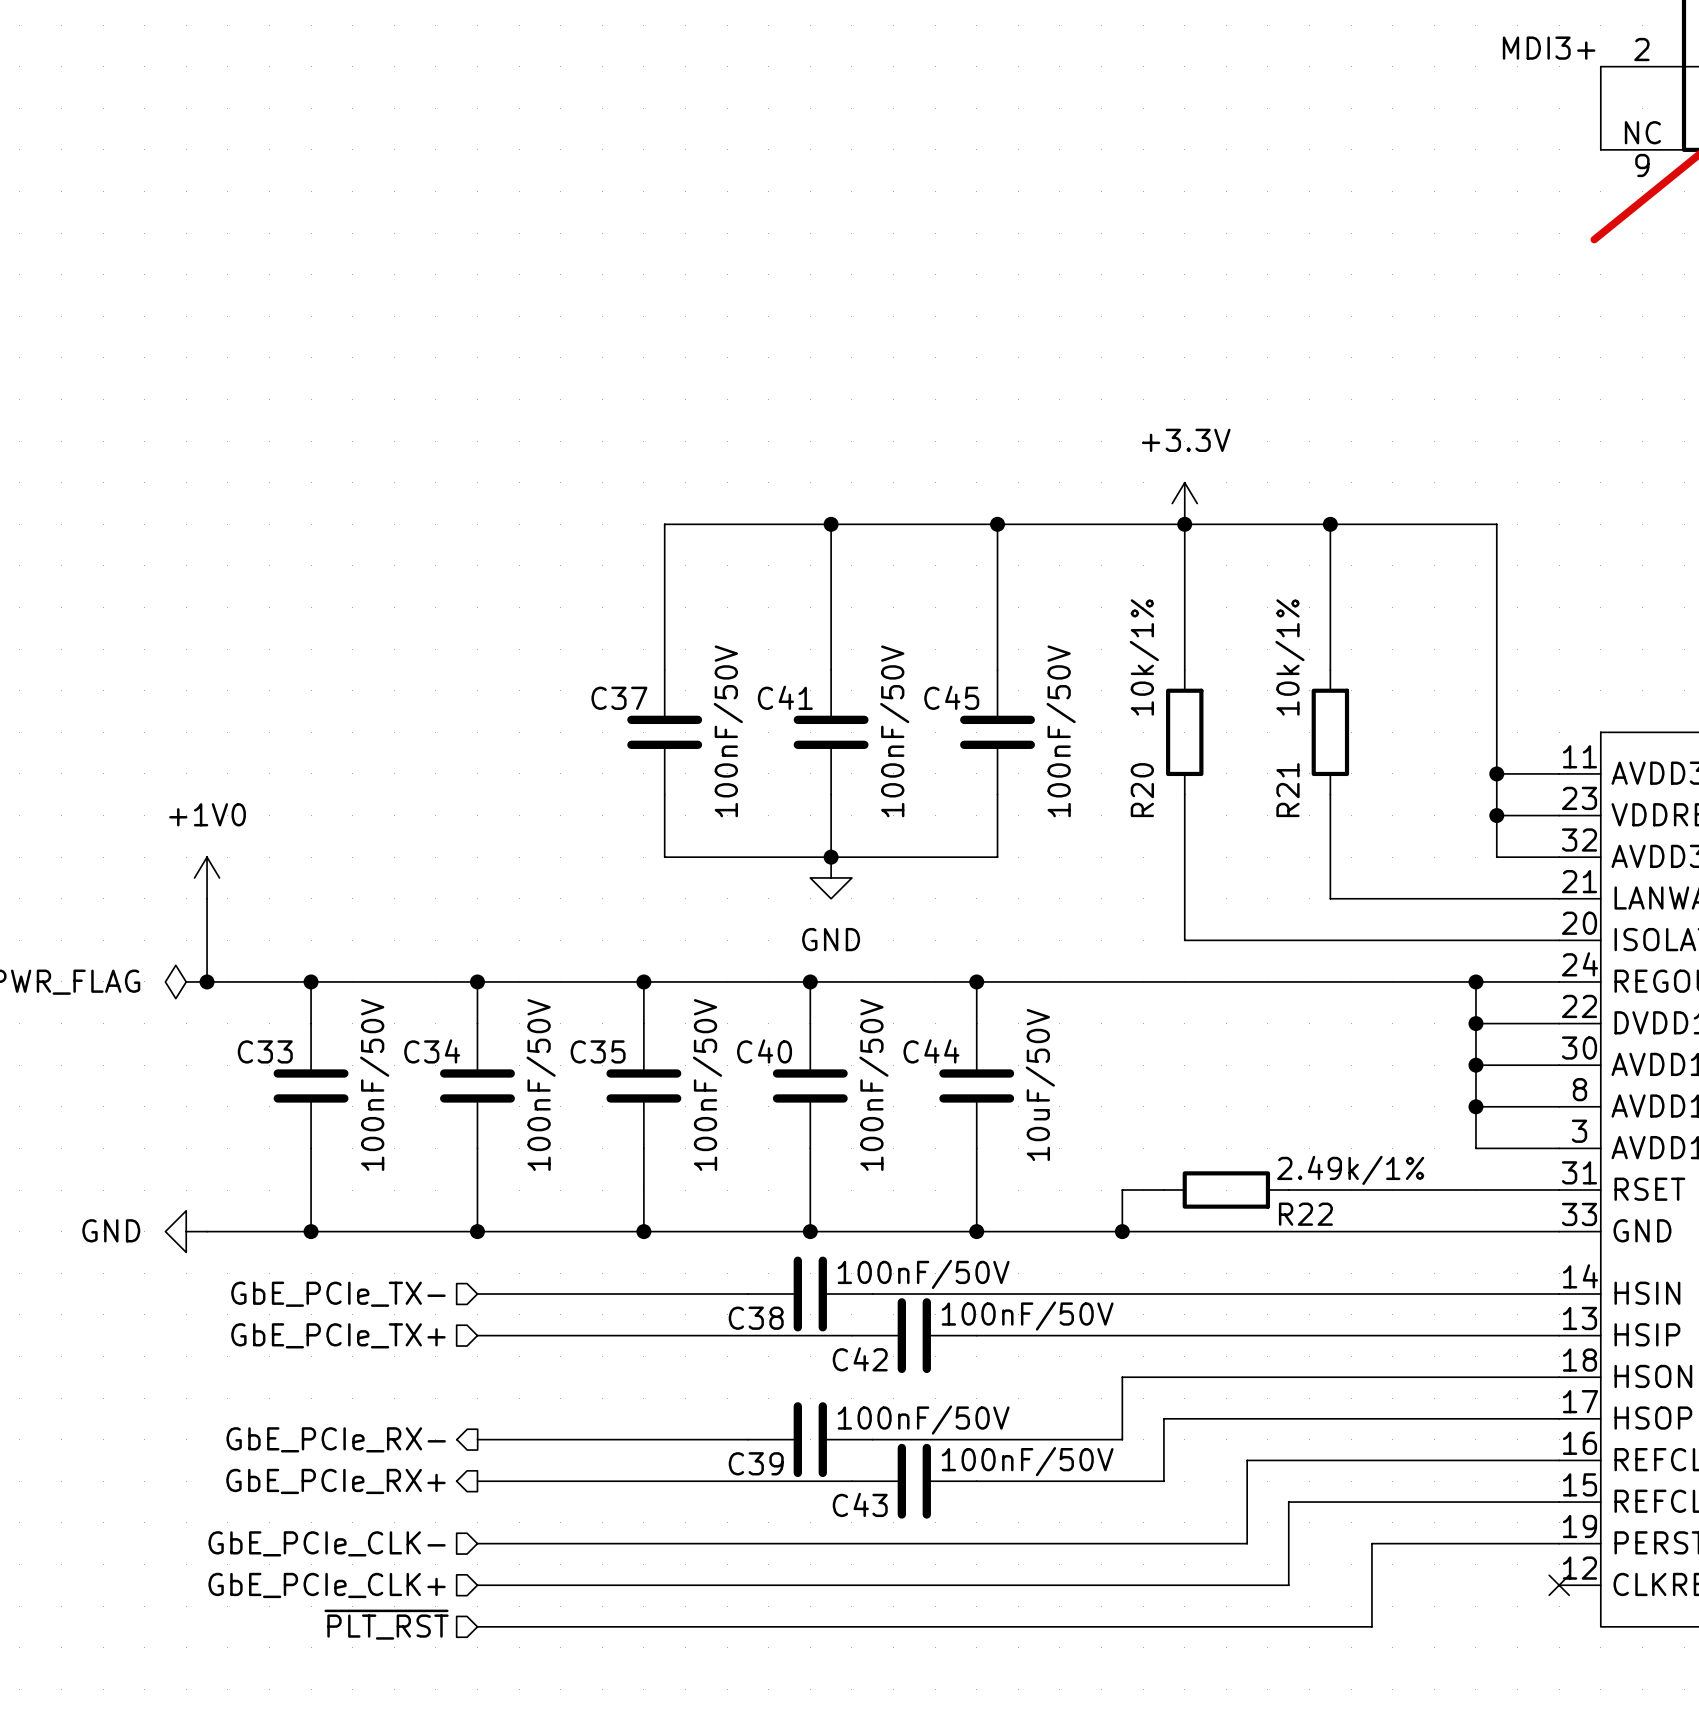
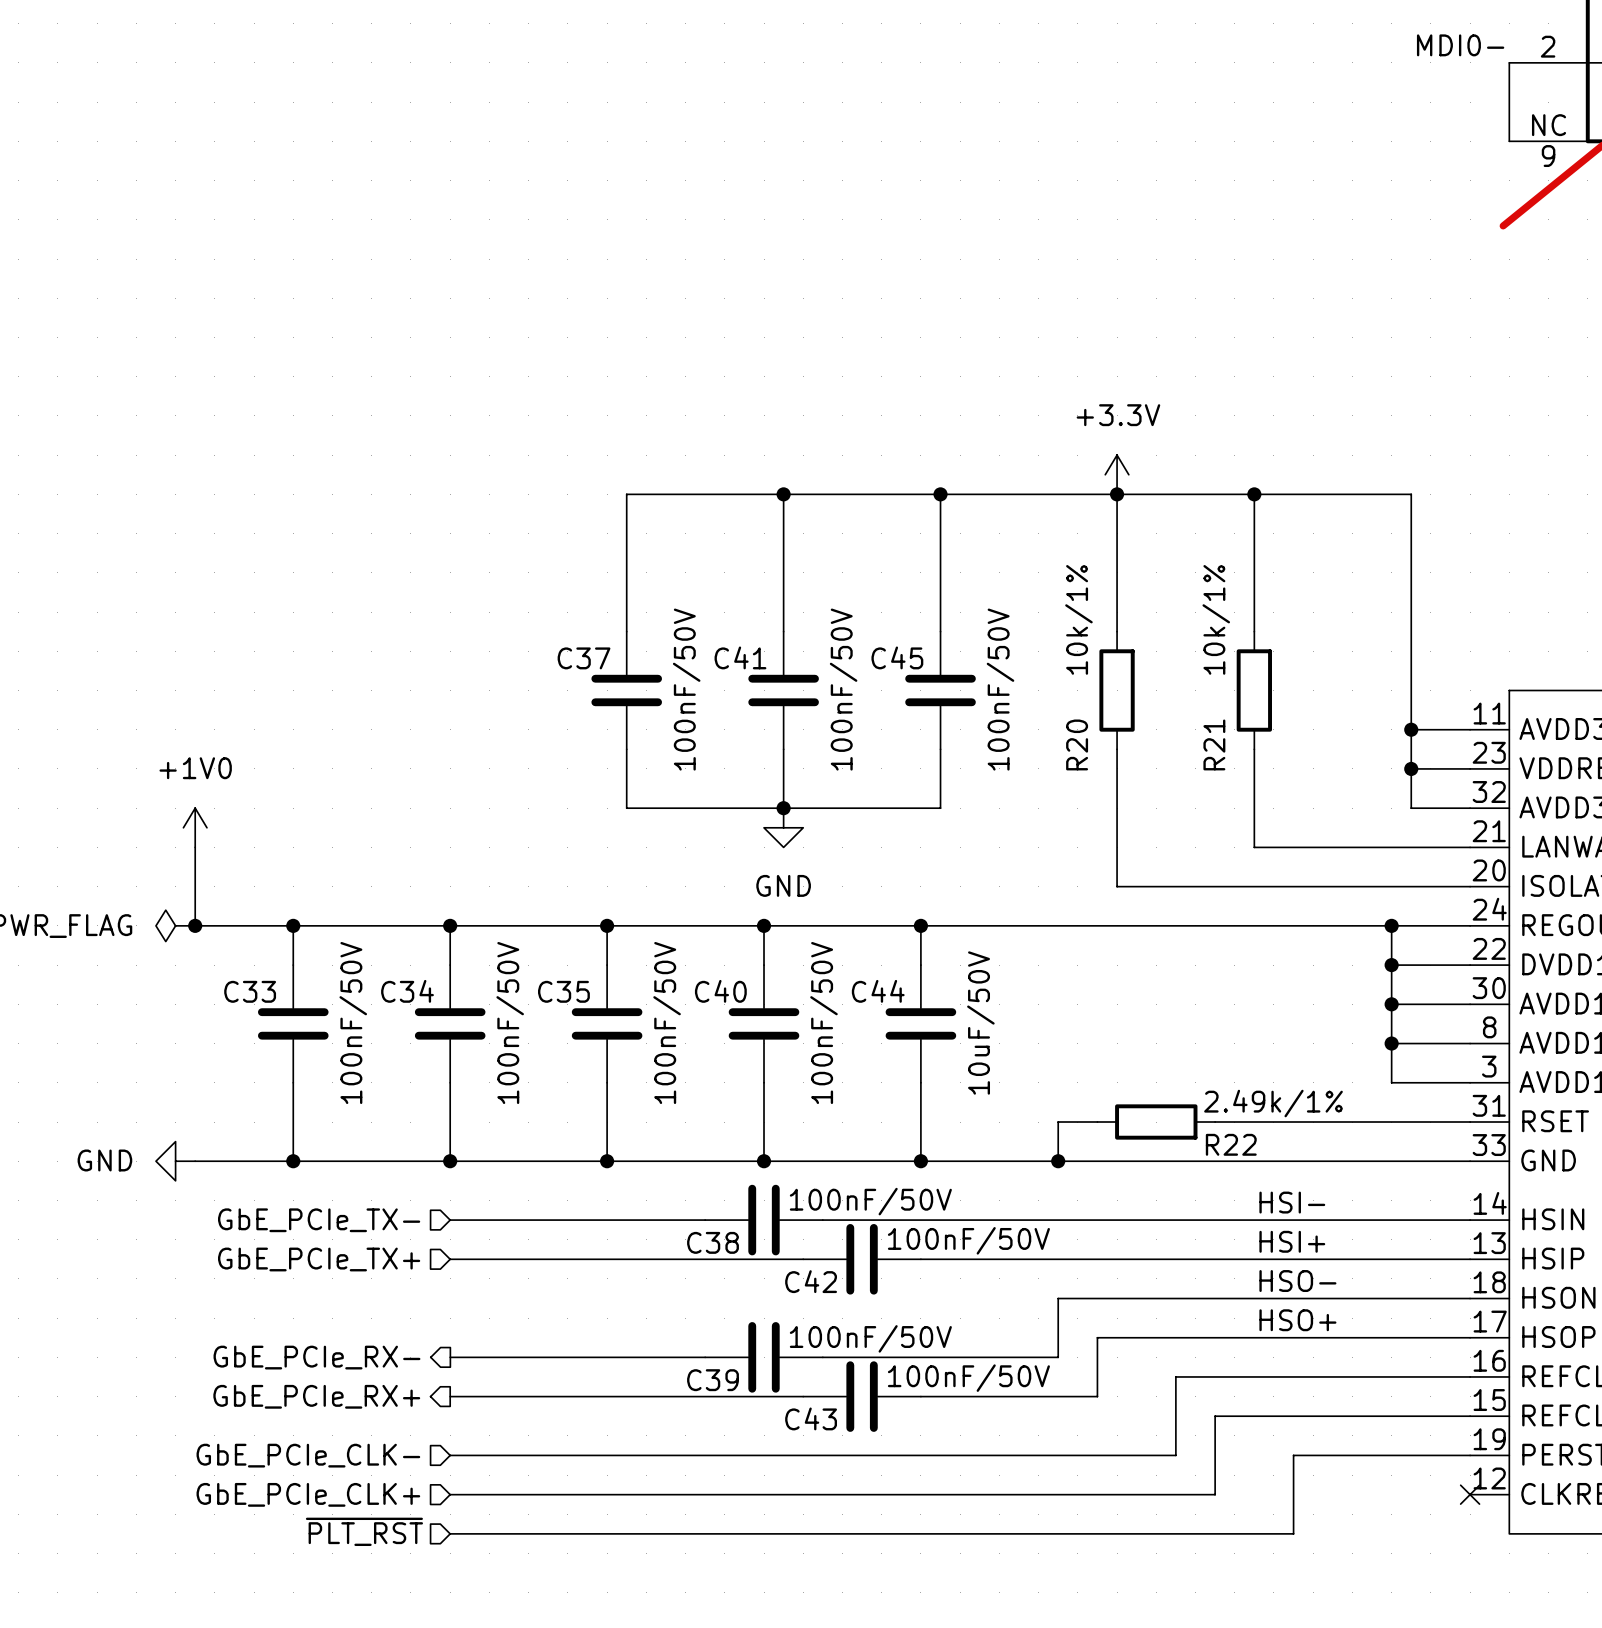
label: MDI3+ (1549, 48) -> MDI0- (1460, 45)
label: none -> HSI- (1292, 1202)
label: none -> HSI+ (1292, 1241)
label: none -> HSO- (1297, 1281)
label: none -> HSO+ (1297, 1320)

